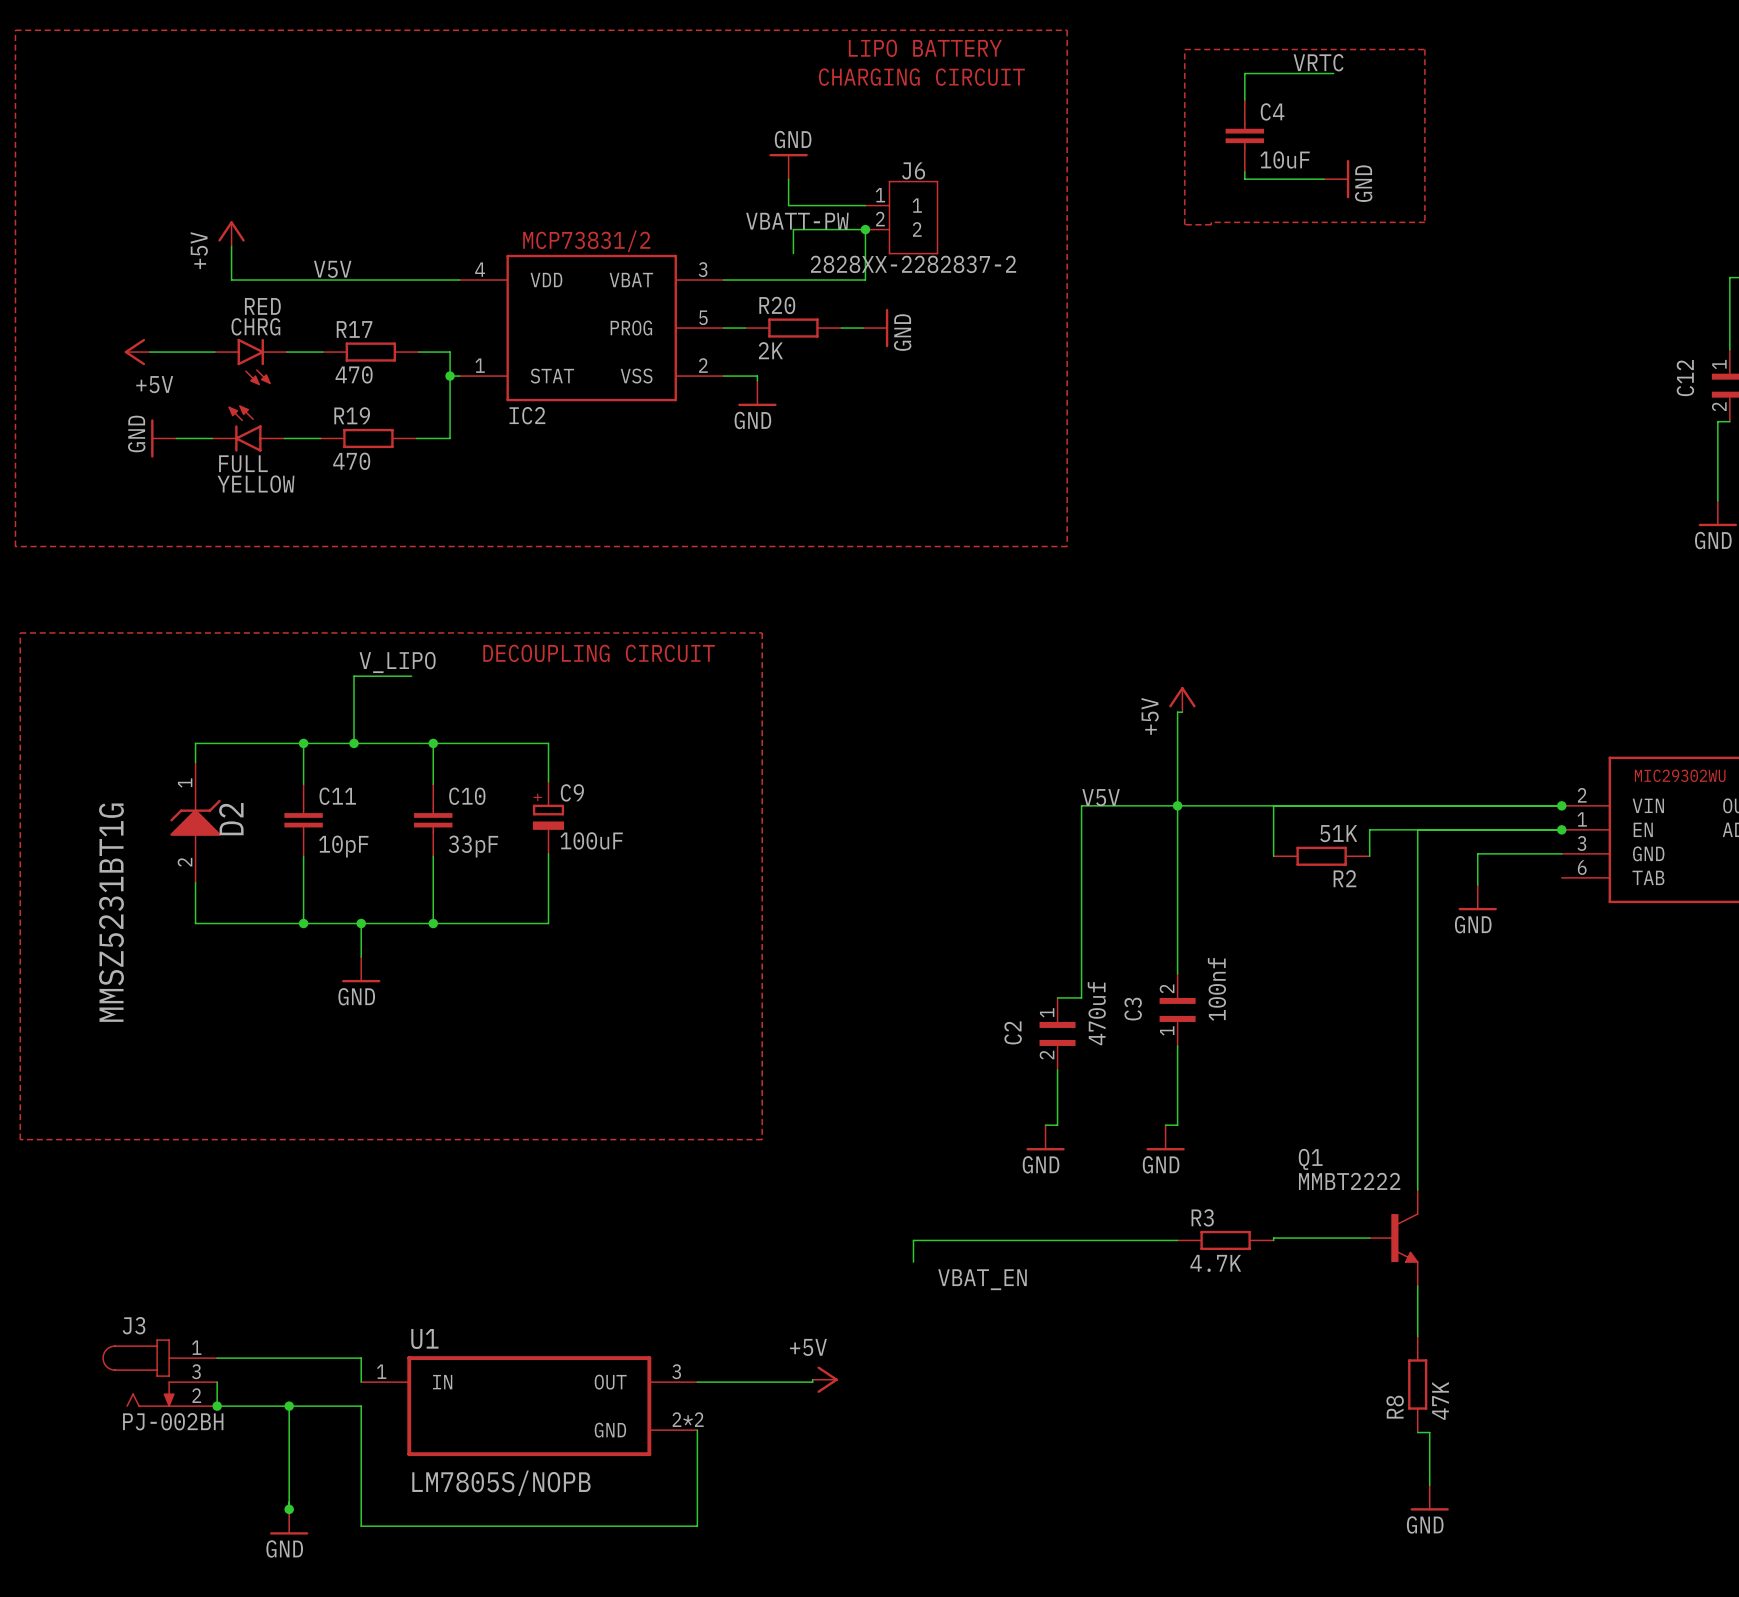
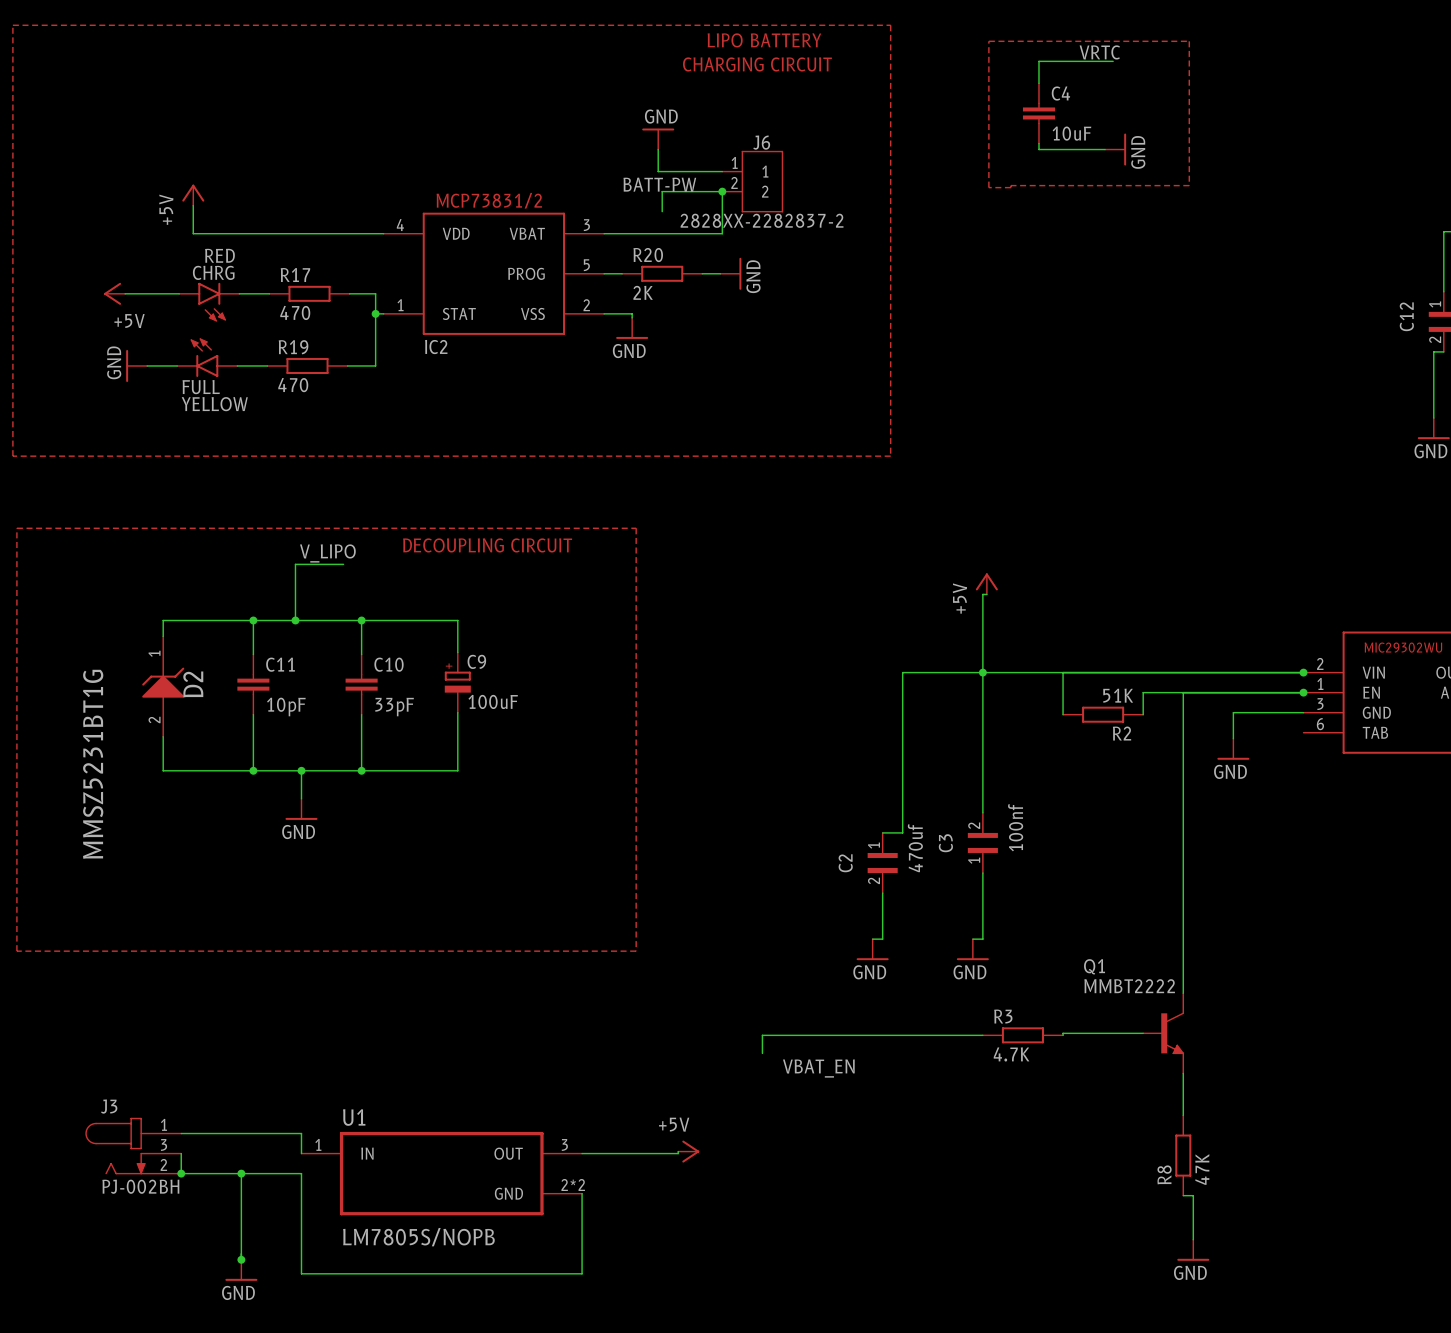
label: VBATT-PW (797, 221) -> BATT-PW (659, 184)
label: V5V (332, 269) -> none
label: V5V (1101, 797) -> none

